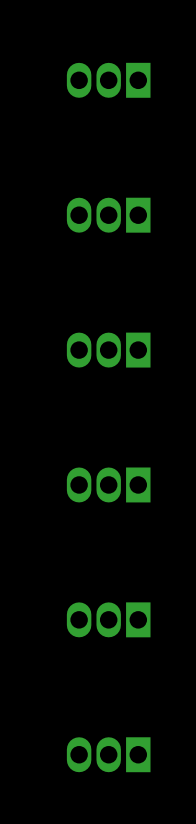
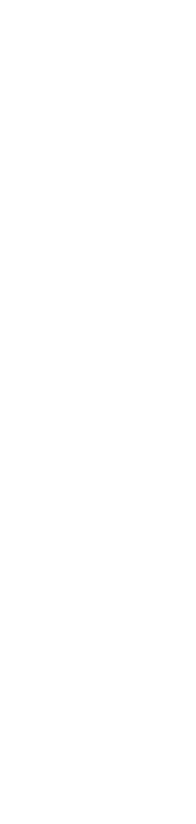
part: (108, 80) -> none
part: (108, 215) -> none
part: (108, 350) -> none
part: (108, 484) -> none
part: (108, 619) -> none
part: (108, 754) -> none

